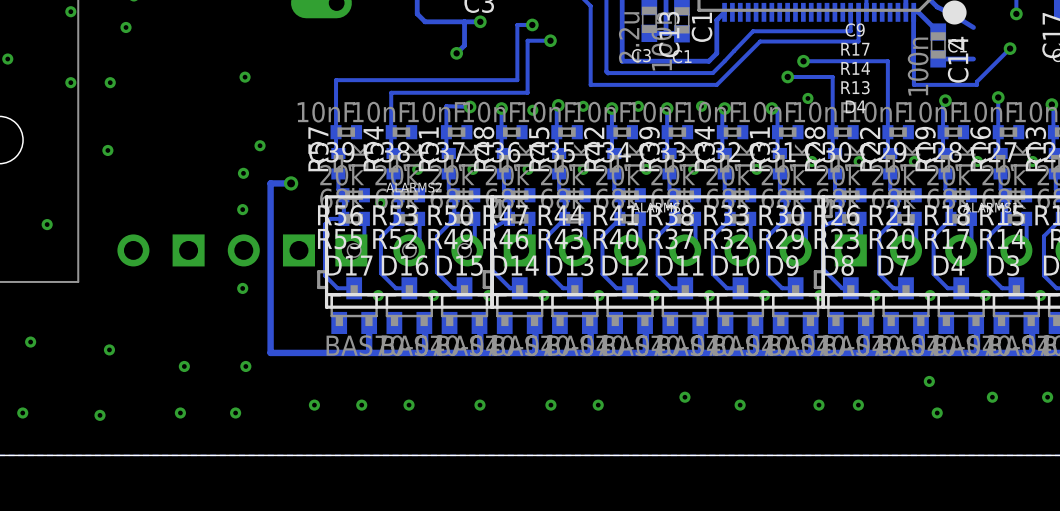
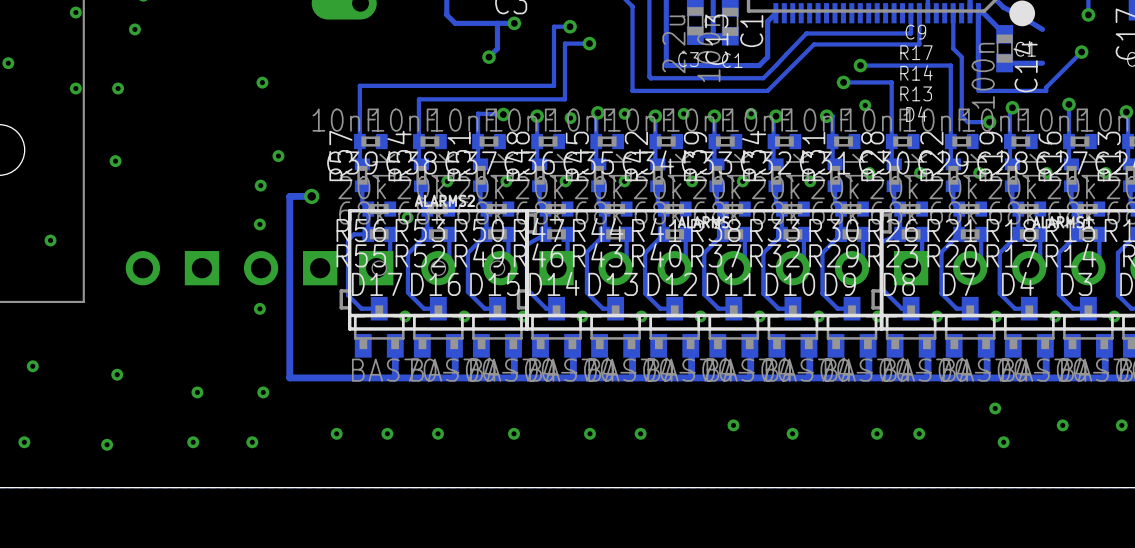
track: none -> (953, 13) (953, 48) (961, 57) (961, 116) (967, 122) (989, 122)
via: none -> (989, 122)

